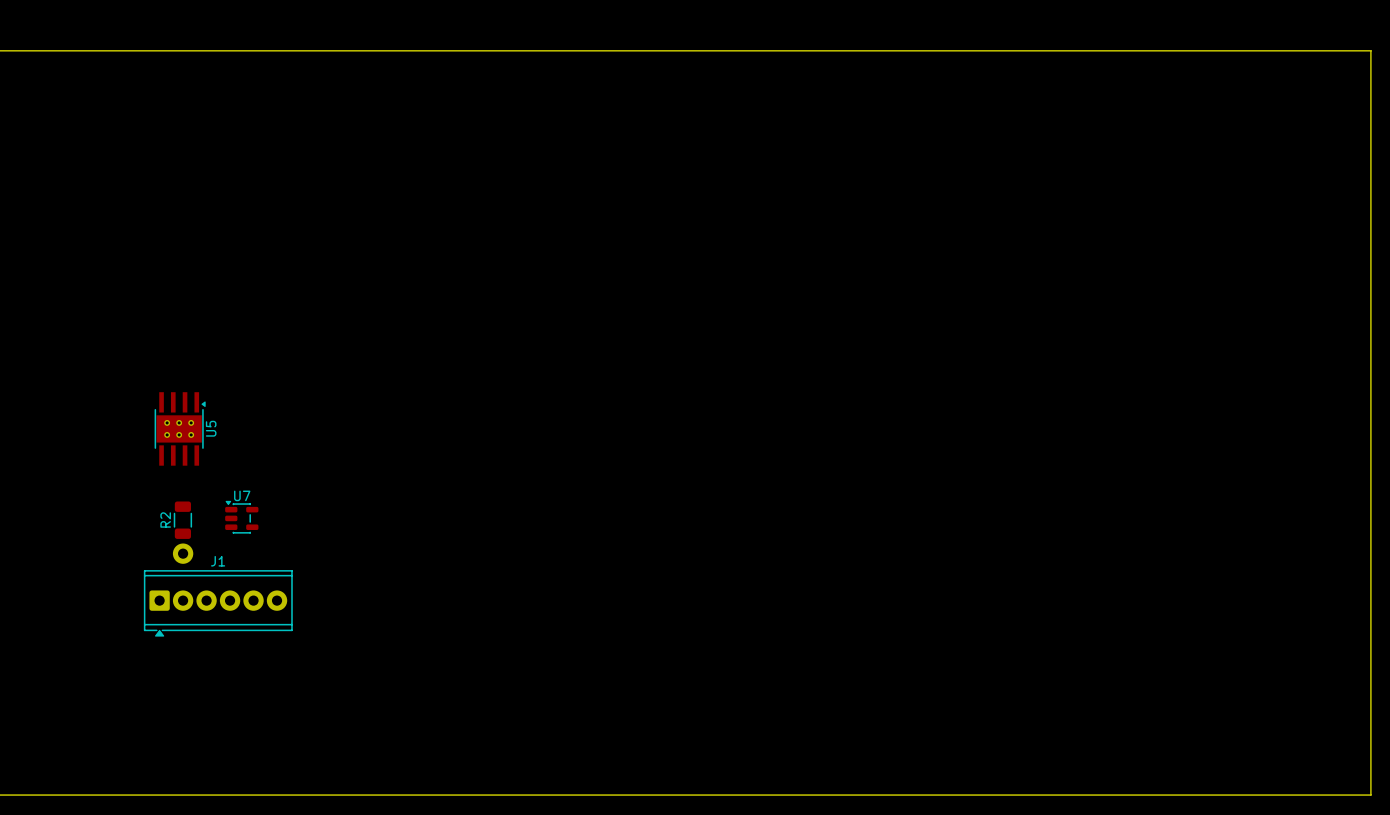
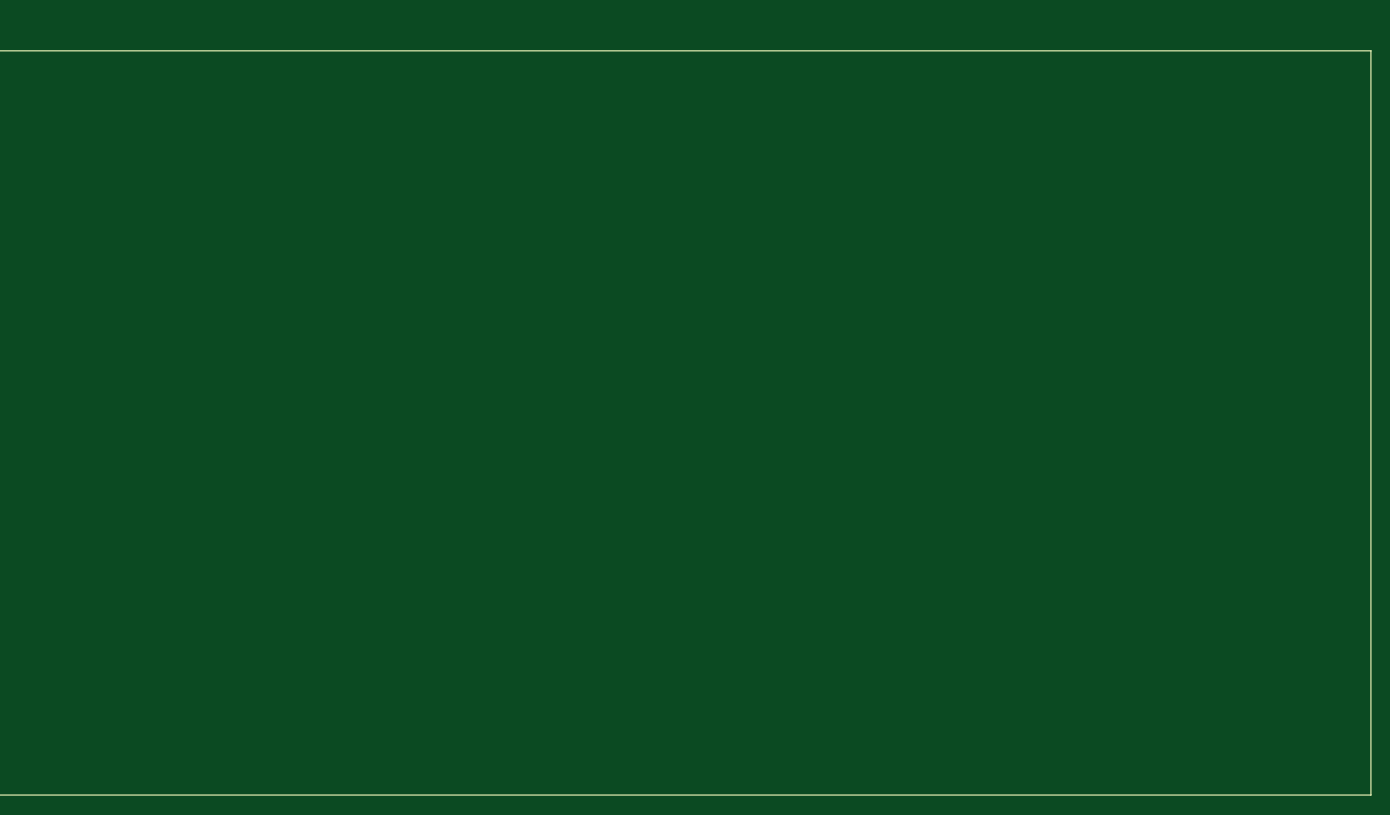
U5: (180, 428) -> none
U7: (241, 517) -> none
R2: (182, 520) -> none
part: (183, 553) -> none
J1: (218, 603) -> none

